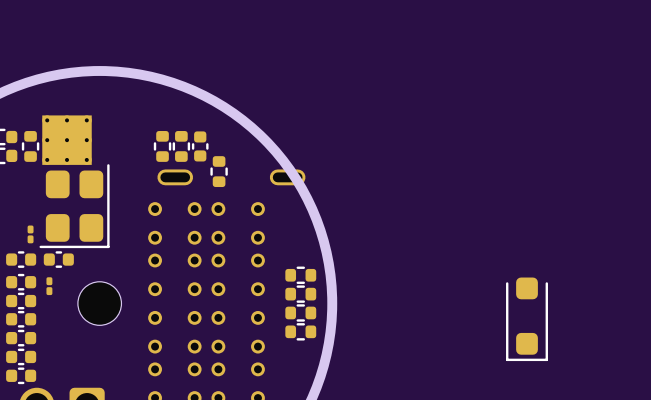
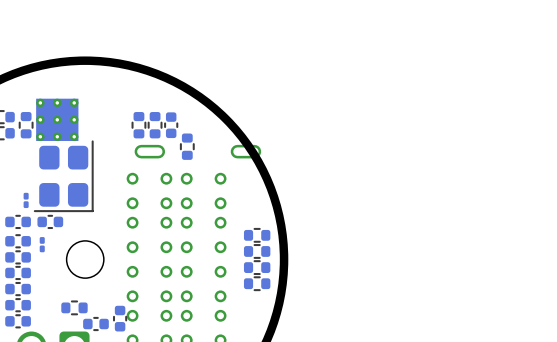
part: (527, 319) -> none
part: none -> (74, 307)
part: none -> (120, 318)
part: none -> (95, 324)

